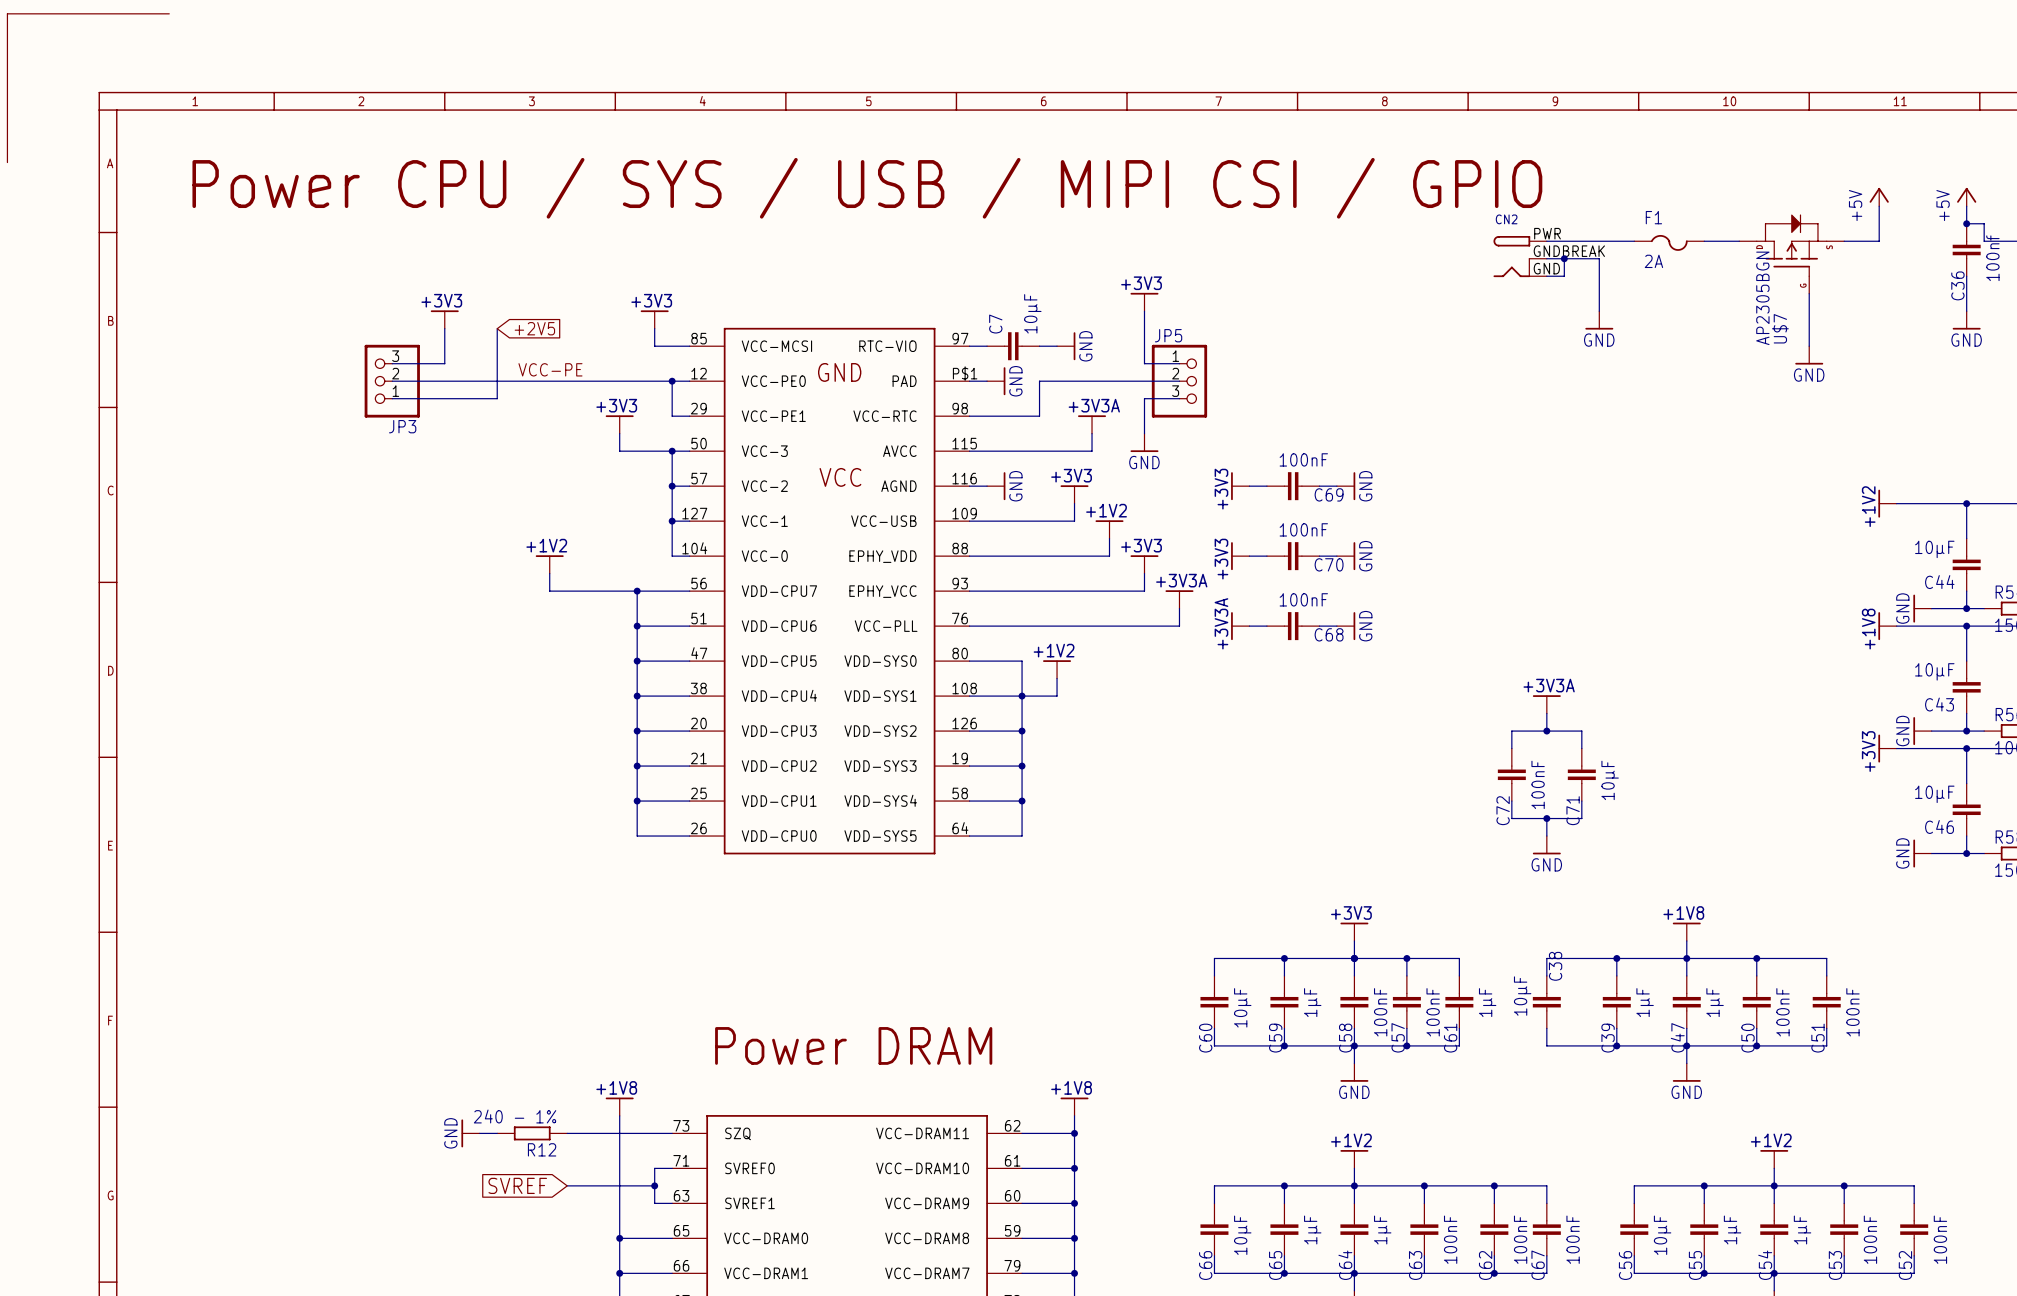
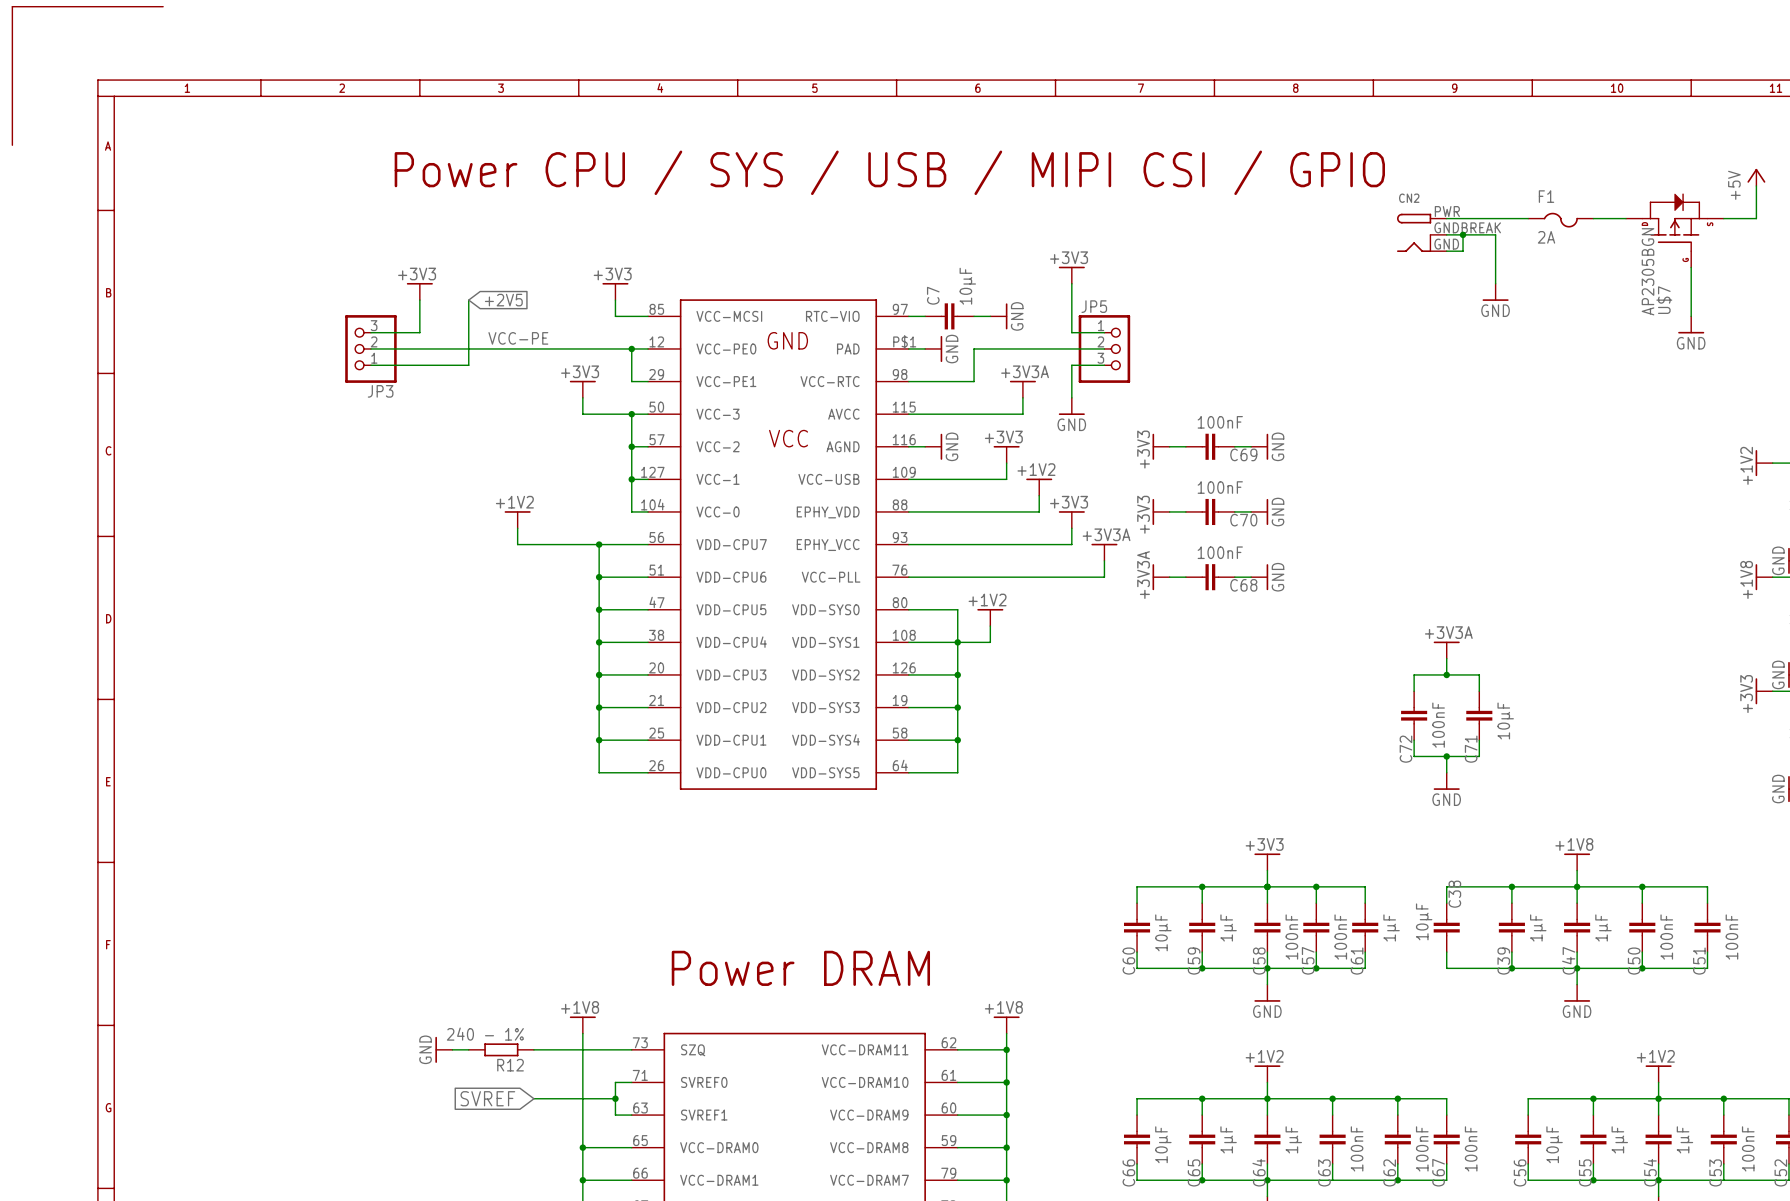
text: Power CPU / SYS / USB / MIPI CSI / GPIO (867, 188) -> none
text: none -> Power CPU / SYS / USB / MIPI CSI / GPIO (889, 172)

